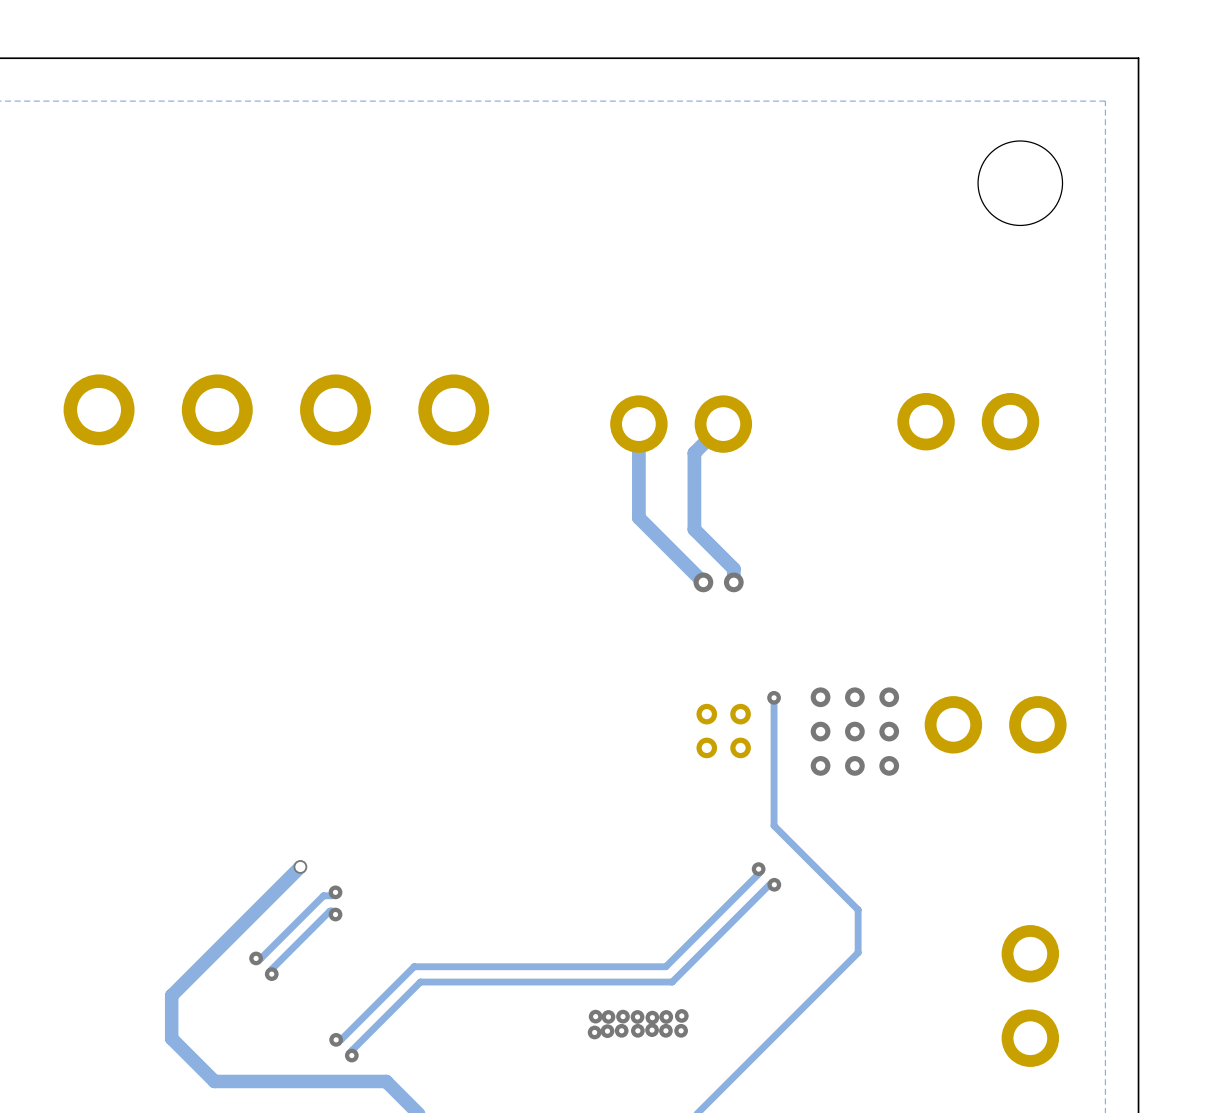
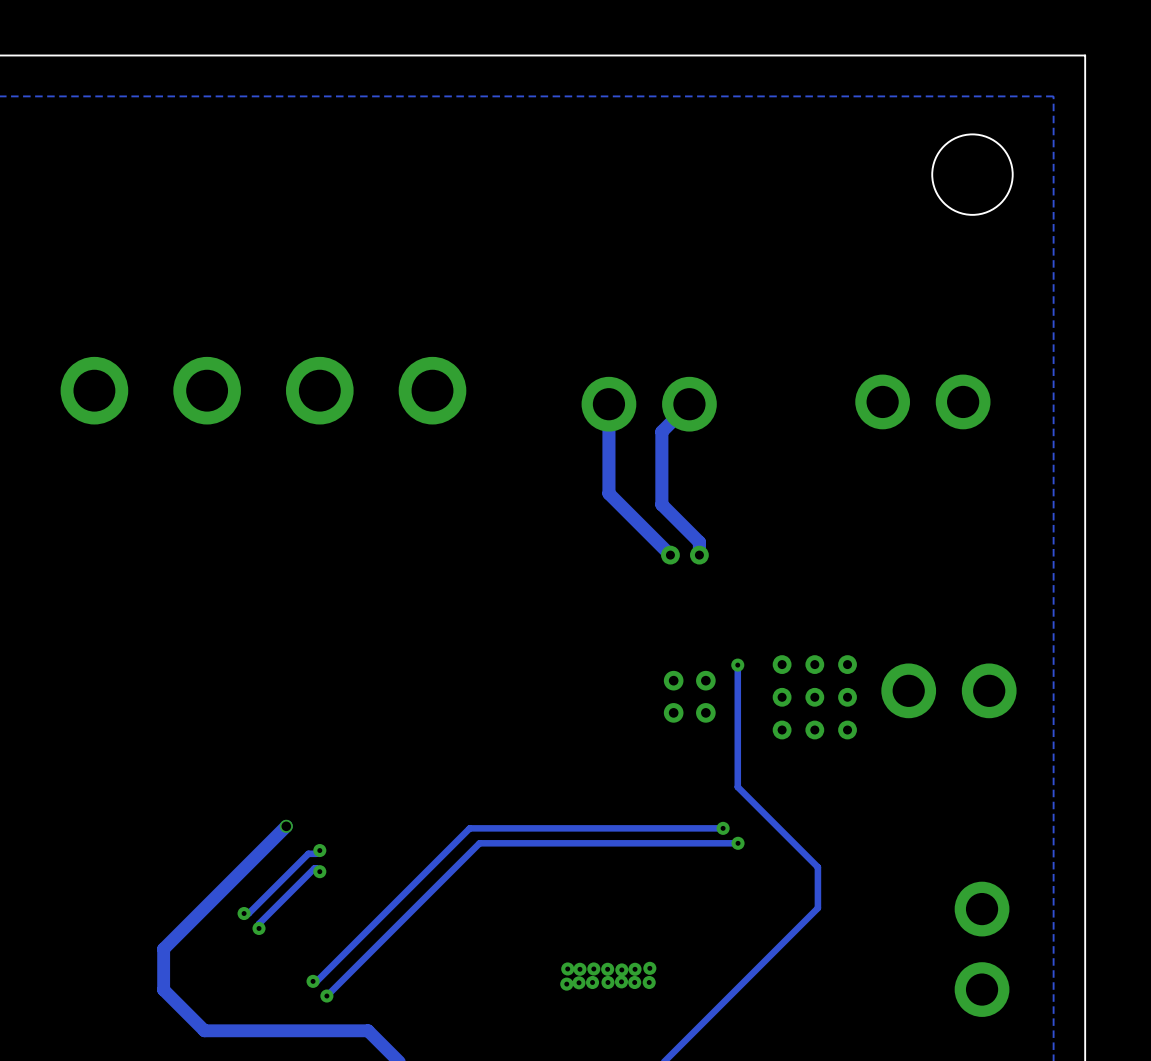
track: (758, 869) (758, 873) (665, 966) (414, 966) (340, 1039) (336, 1039) -> (723, 828) (469, 828) (316, 981) (313, 981)
track: (769, 884) (672, 982) (420, 982) (351, 1050) (351, 1055) -> (733, 843) (479, 843) (326, 996)
via: none -> (313, 981)
via: (336, 1039) -> none
via: none -> (326, 996)
via: (351, 1055) -> none

